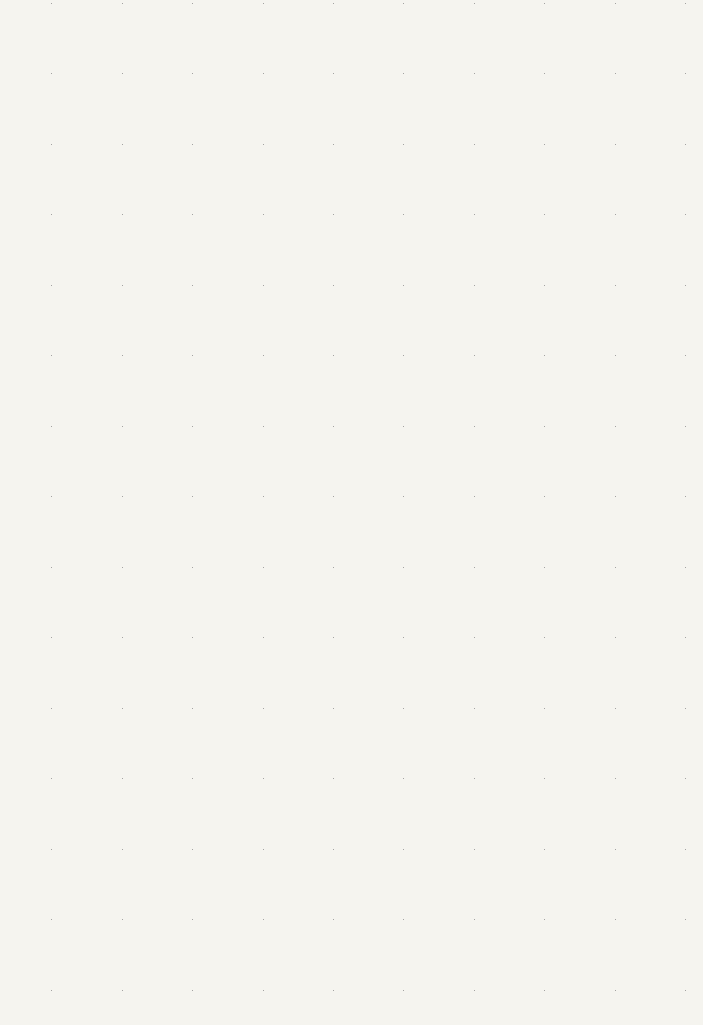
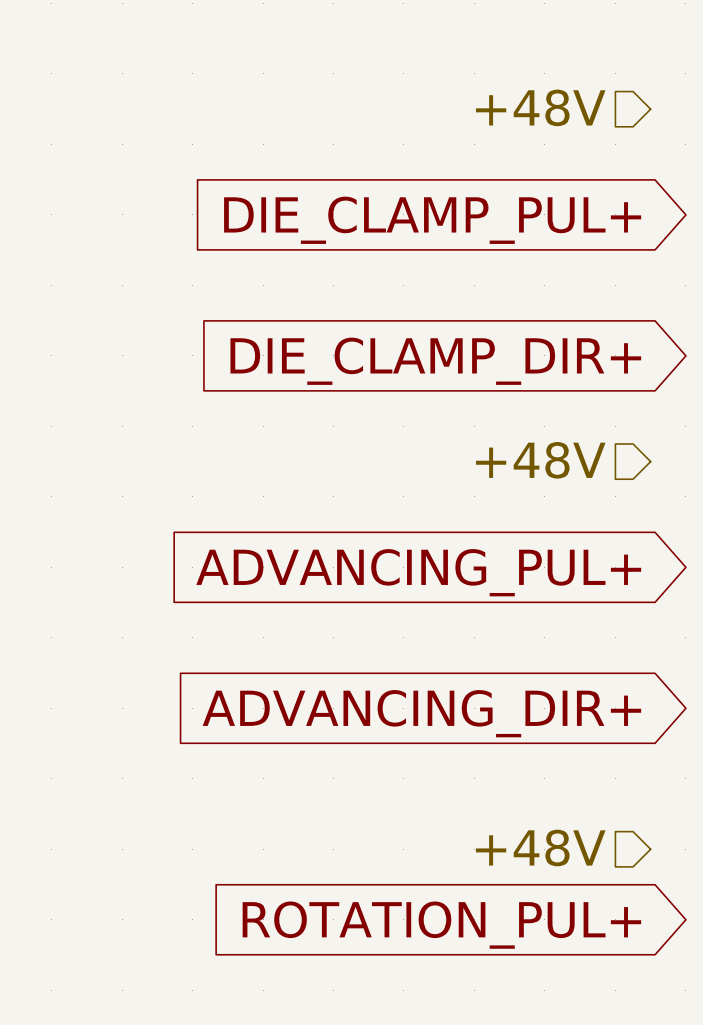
hierarchical label: none -> +48V (540, 107)
global label: none -> DIE_CLAMP_PUL+ (432, 220)
global label: none -> DIE_CLAMP_DIR+ (435, 361)
hierarchical label: none -> +48V (540, 460)
global label: none -> ADVANCING_PUL+ (418, 572)
global label: none -> ADVANCING_DIR+ (421, 713)
hierarchical label: none -> +48V (540, 847)
global label: none -> ROTATION_PUL+ (441, 925)

